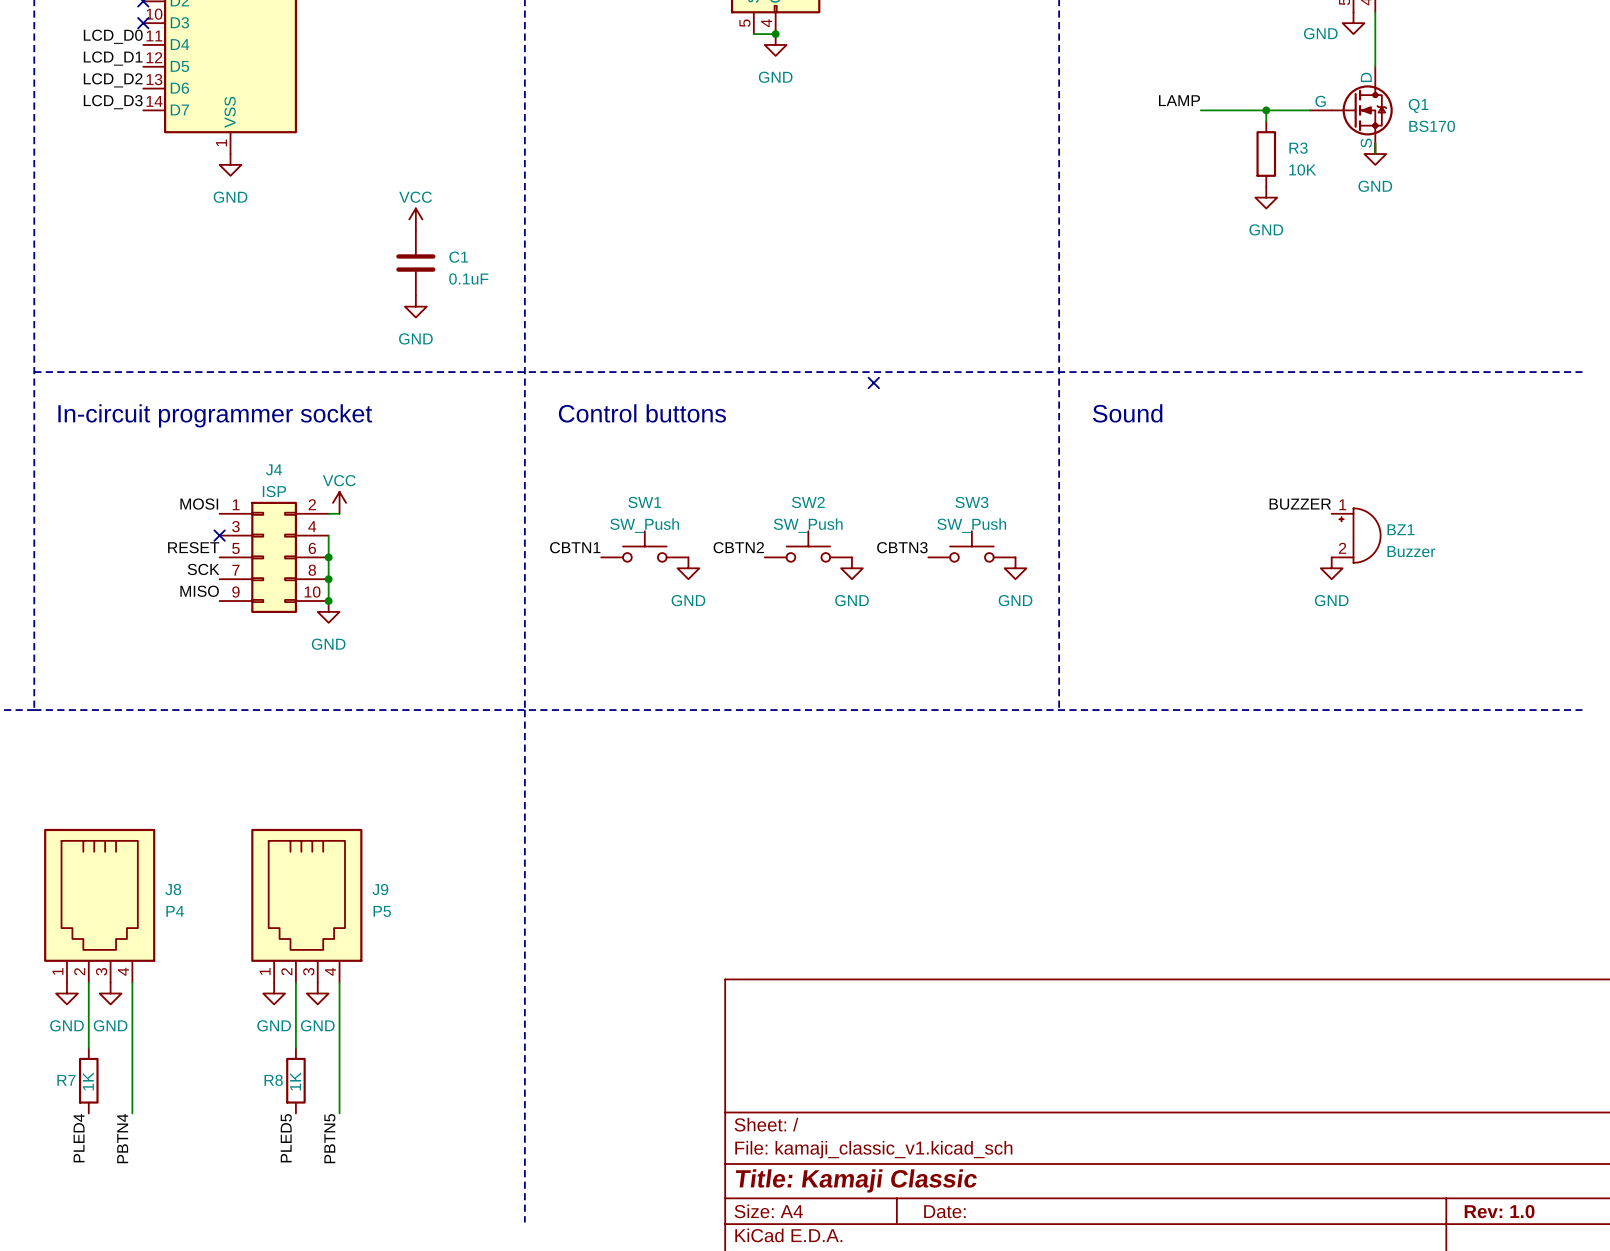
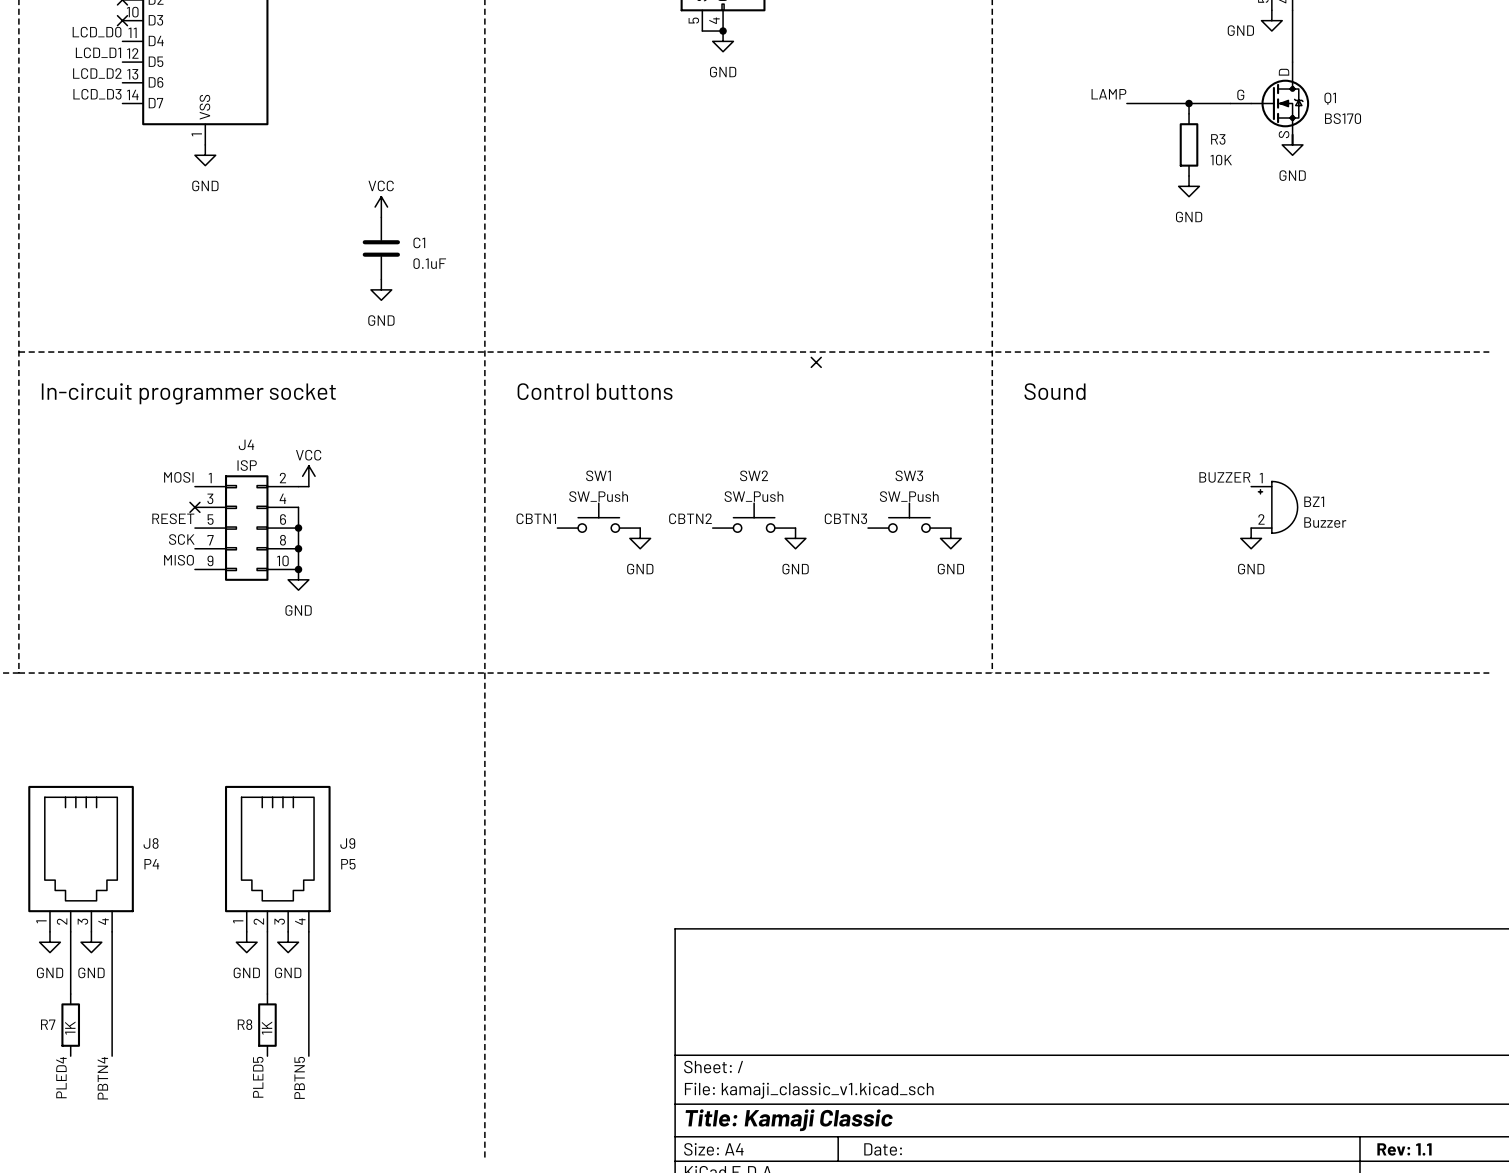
title block: Rev: 1.0 (1499, 1211) -> Rev: 1.1 (1404, 1149)

